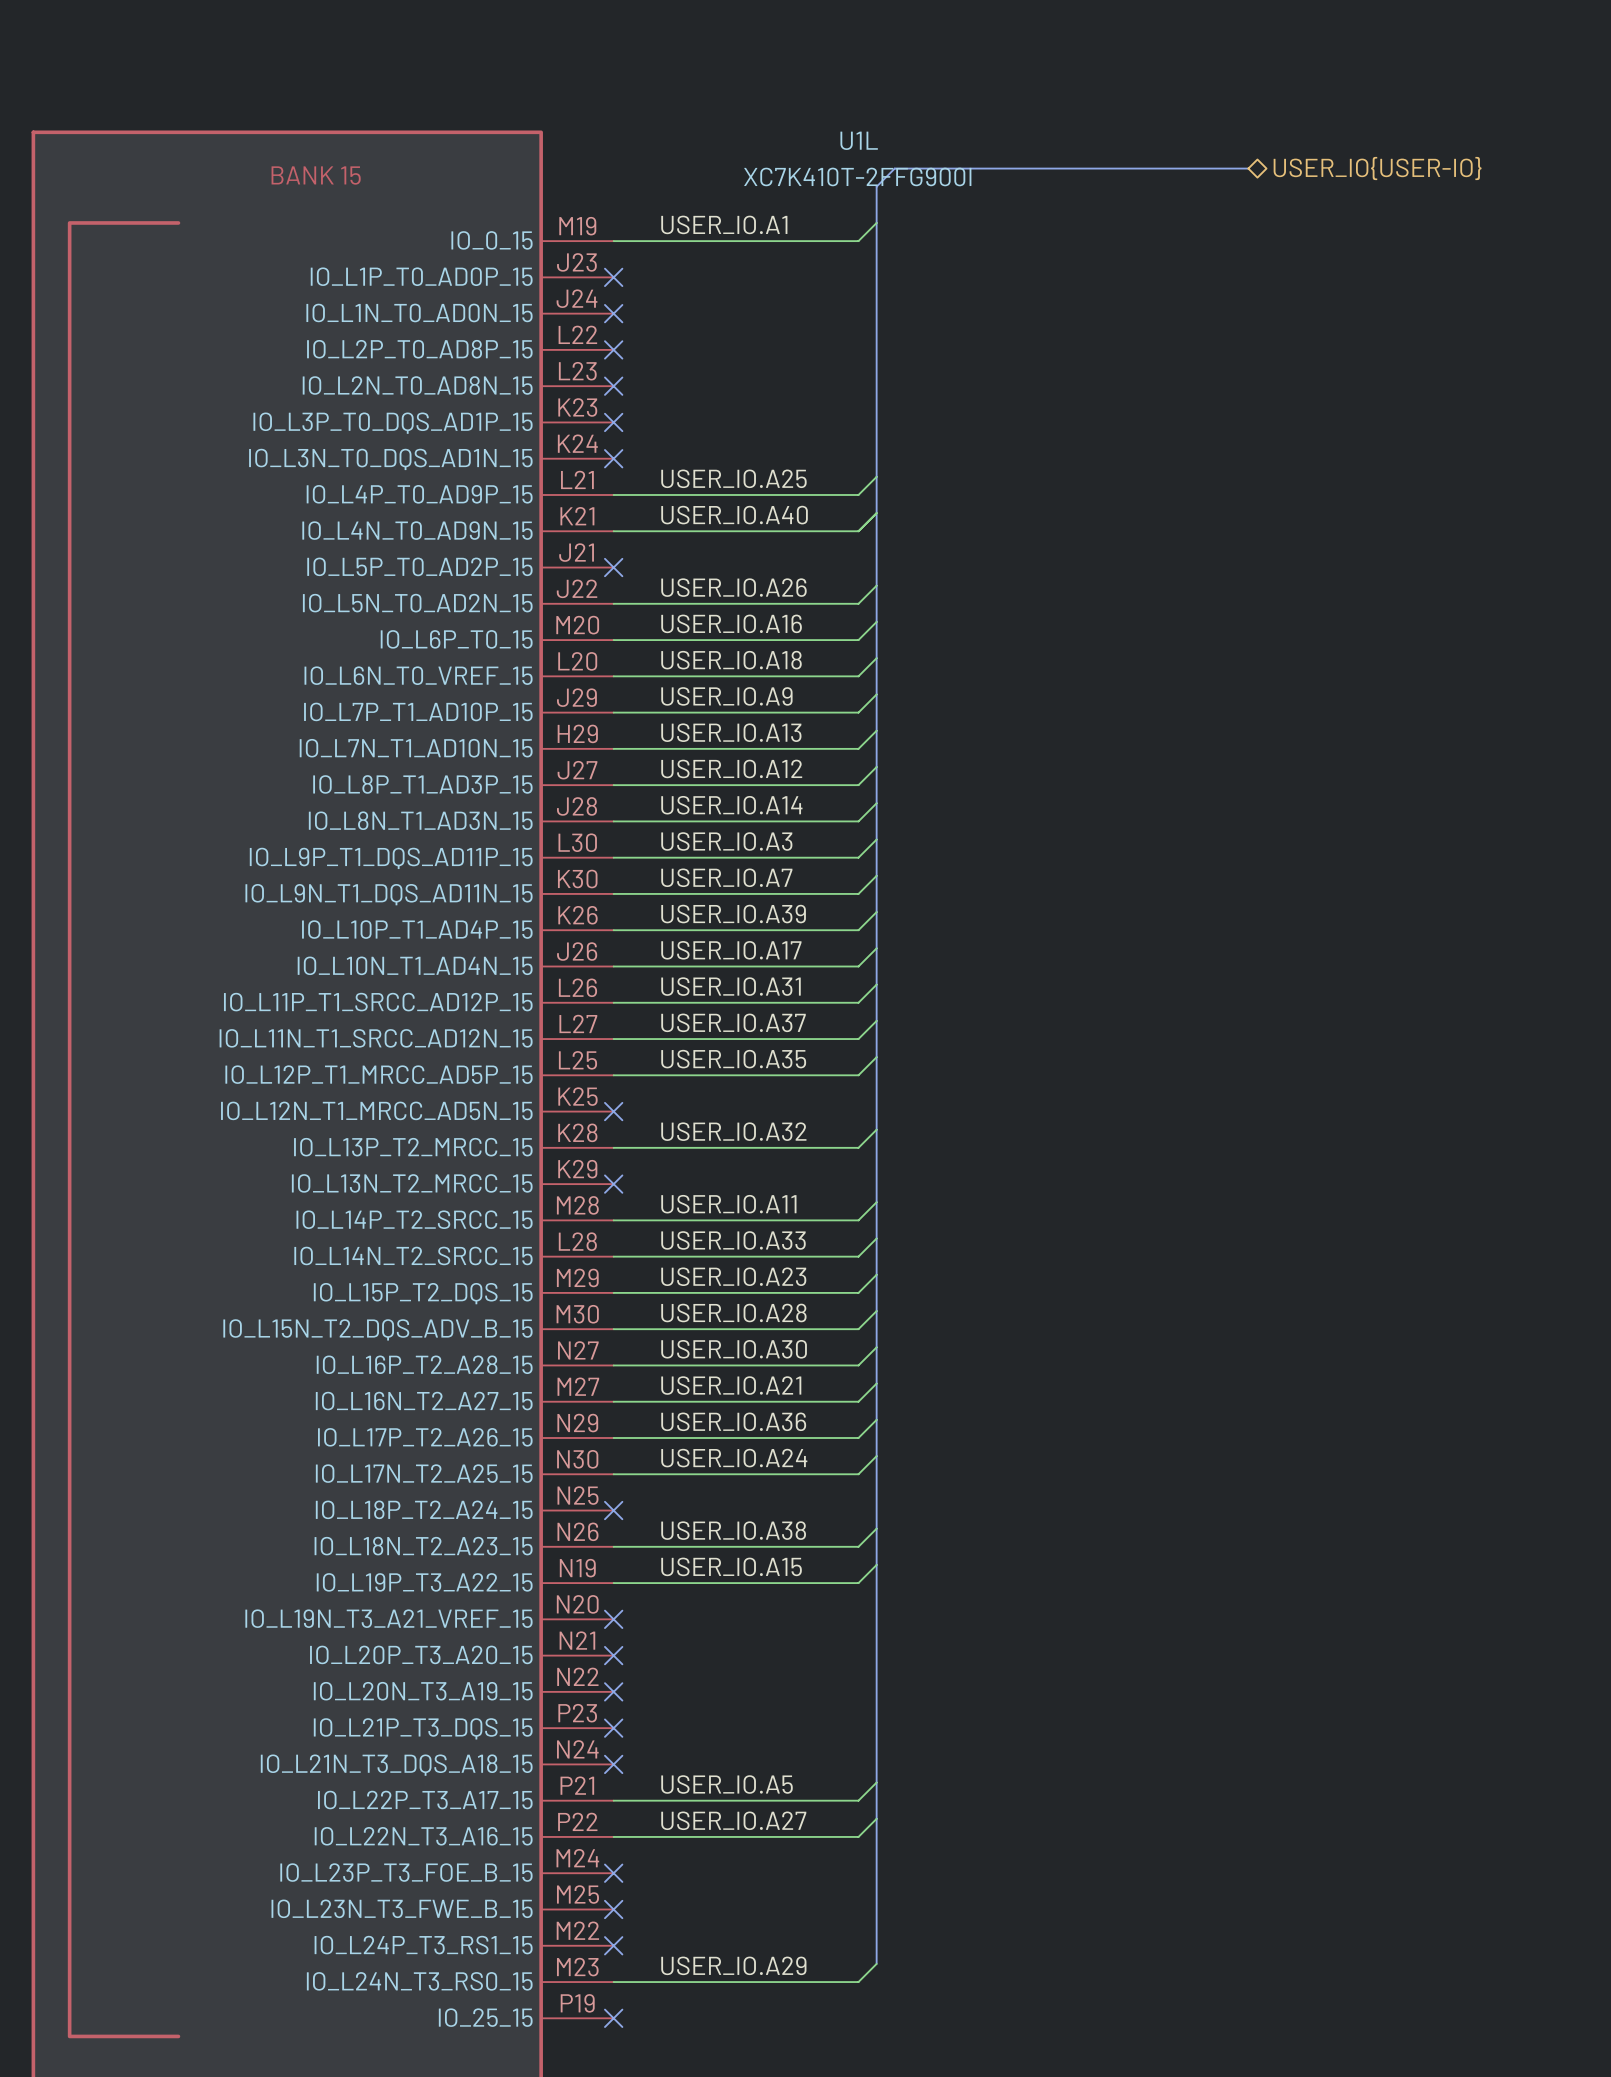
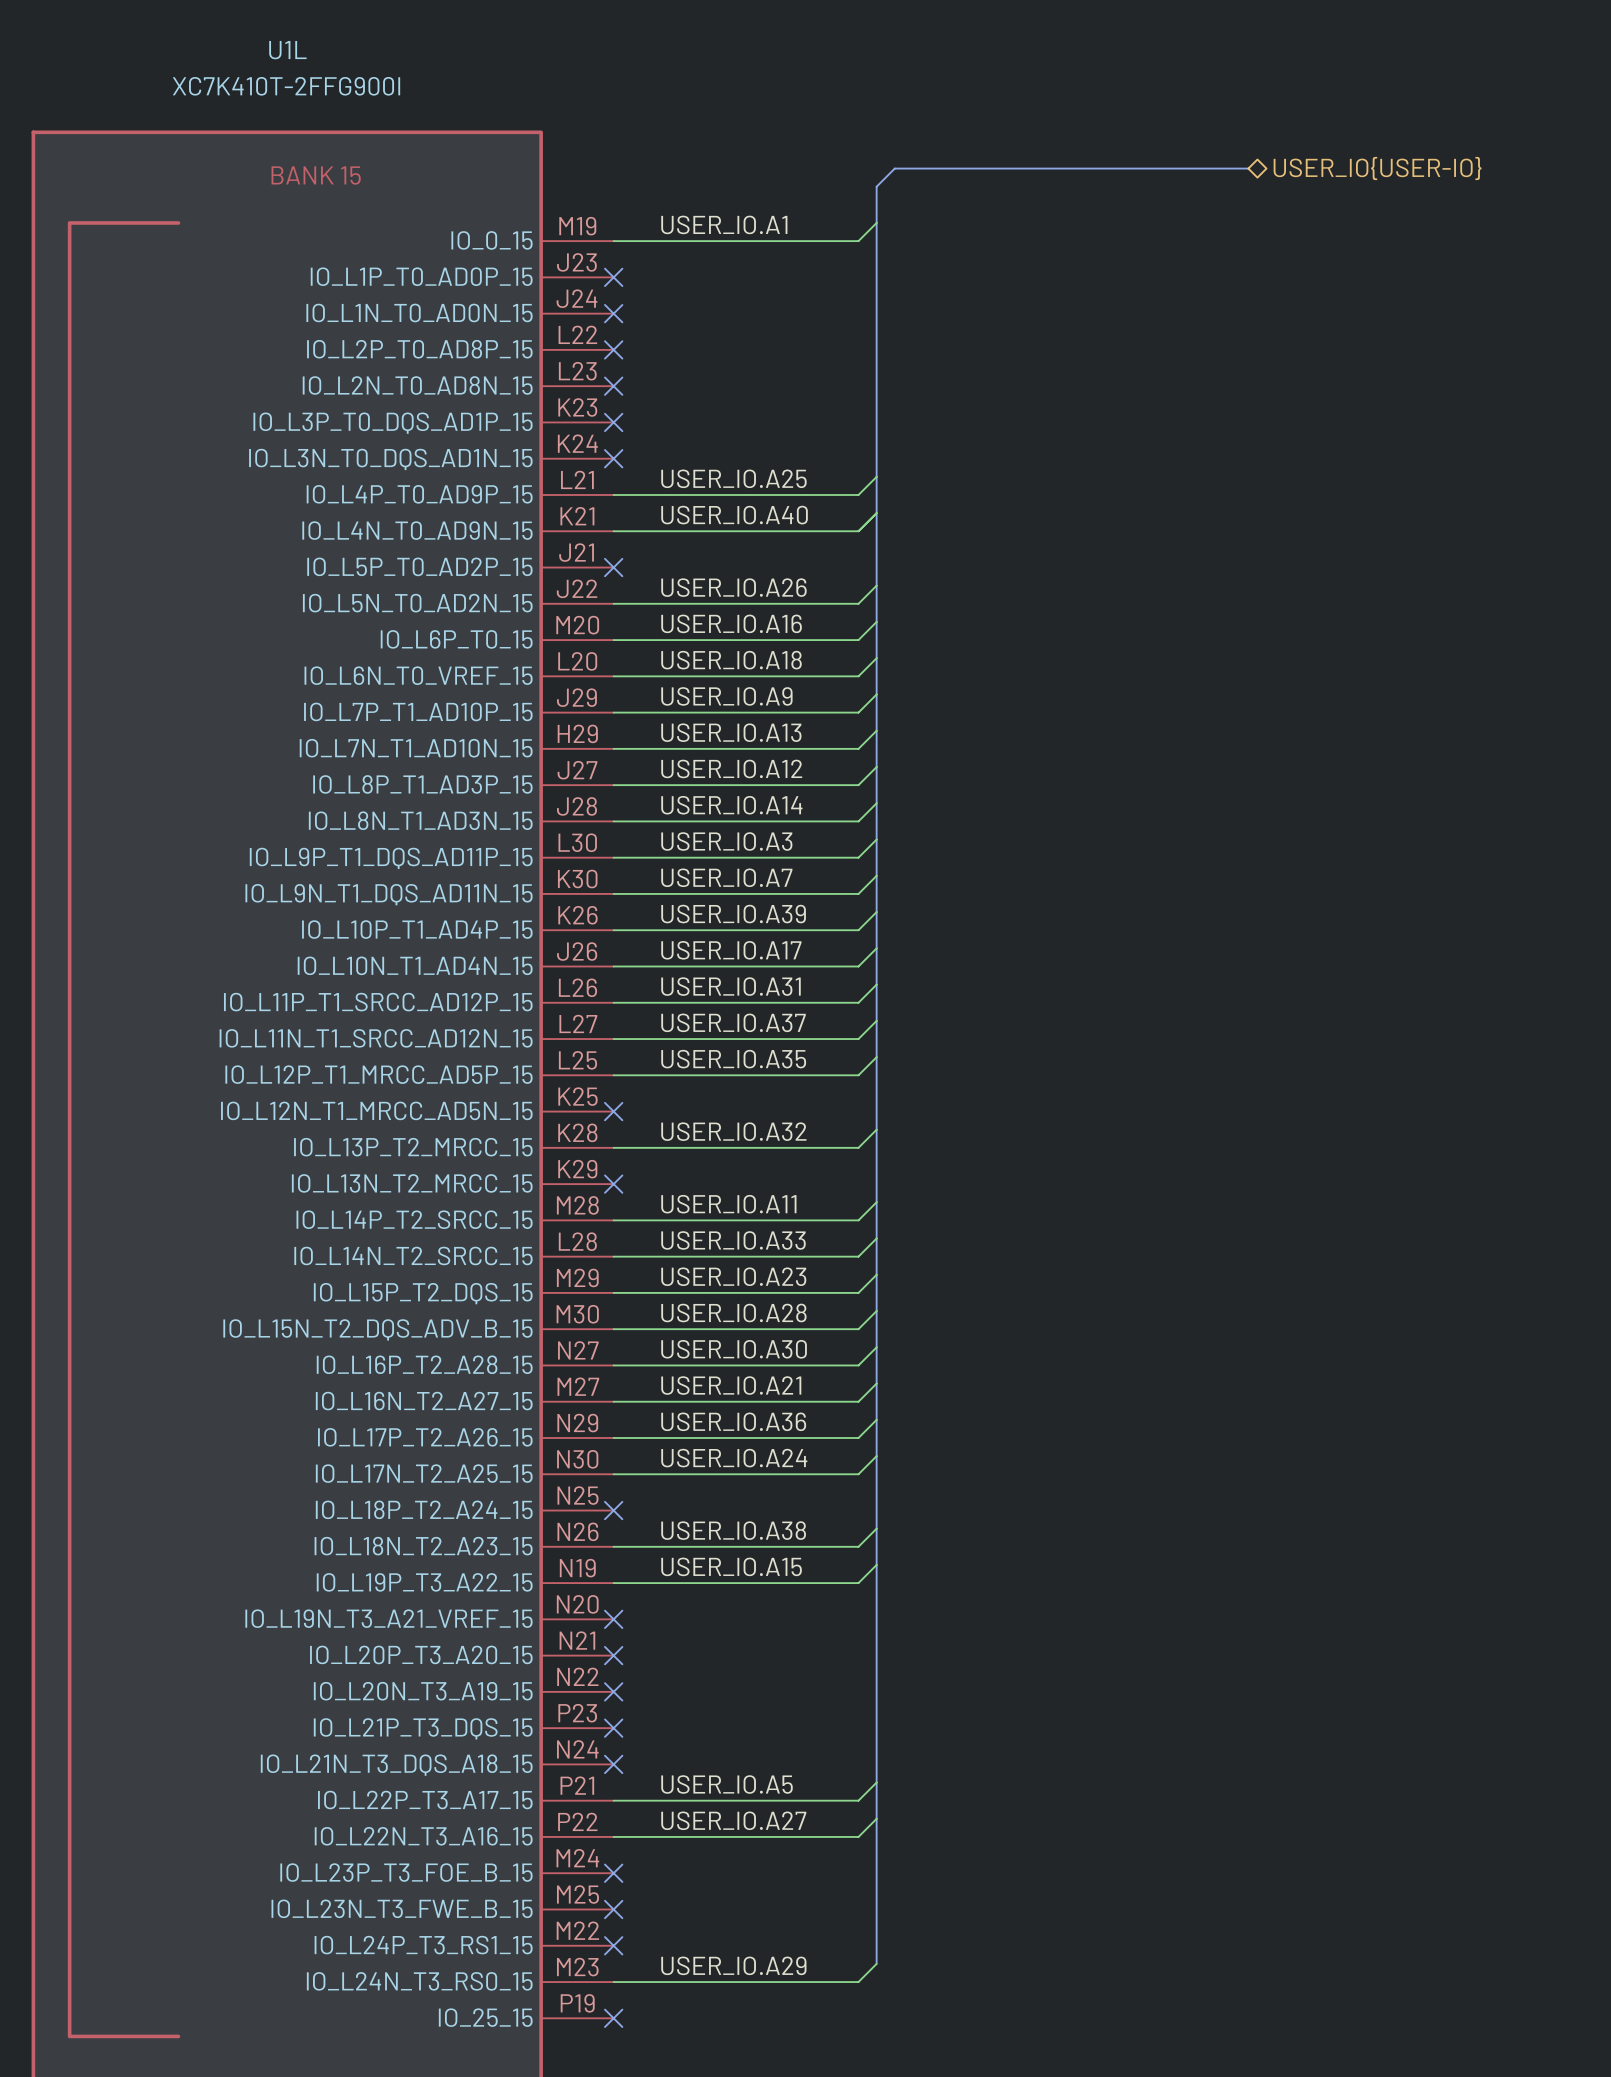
U1L name position: U1L (859, 140) -> U1L (287, 50)
U1L value position: XC7K410T-2FFG900I (857, 176) -> XC7K410T-2FFG900I (286, 86)

